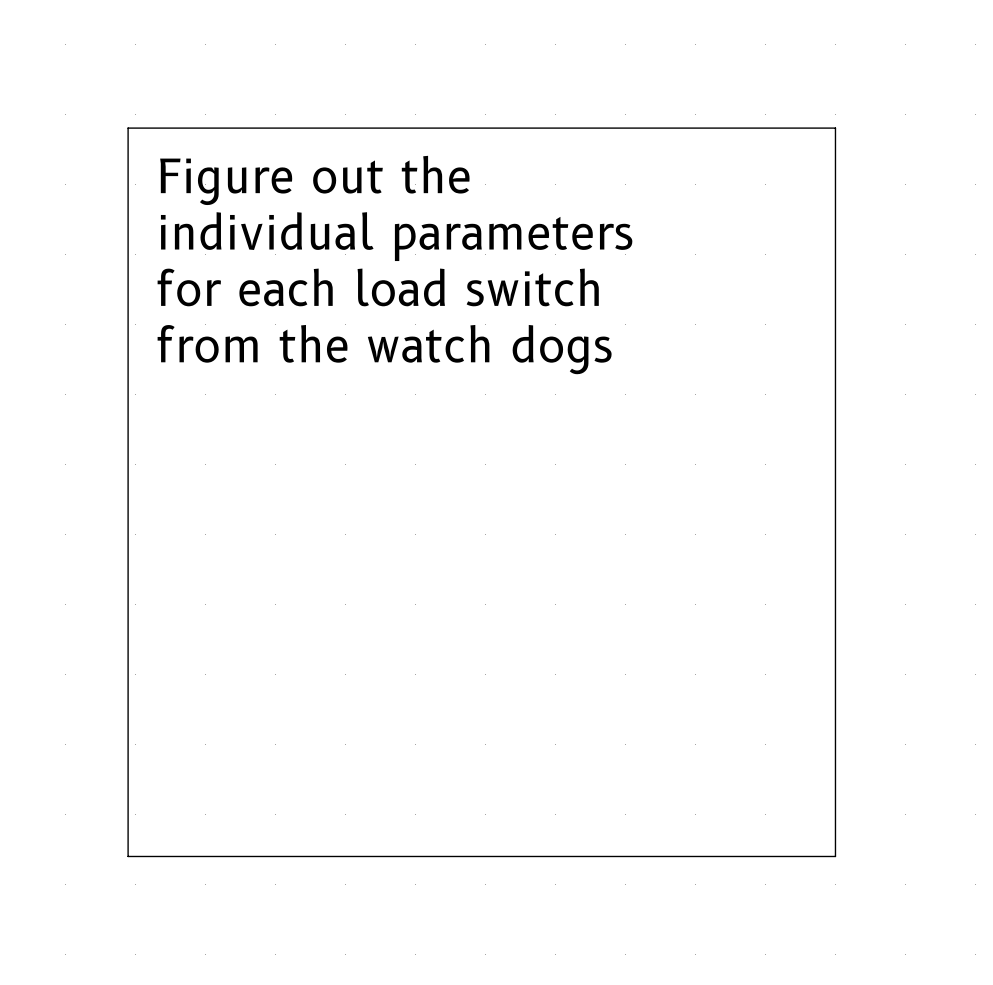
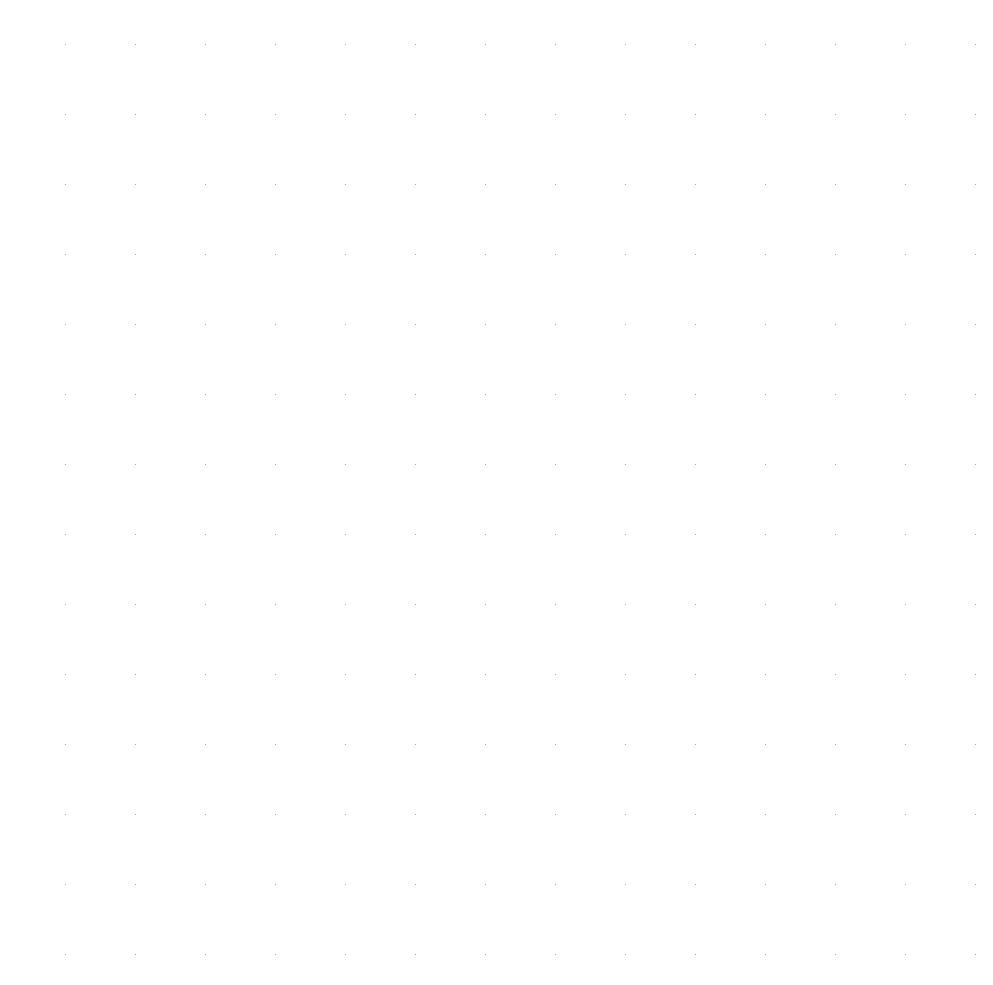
line: (128, 128) (835, 128) (835, 856) (128, 856) (128, 128) -> none
text: Figure out the (314, 180) -> none
text: individual parameters (396, 236) -> none
text: for each load switch (378, 287) -> none
text: from the watch dogs (384, 349) -> none

